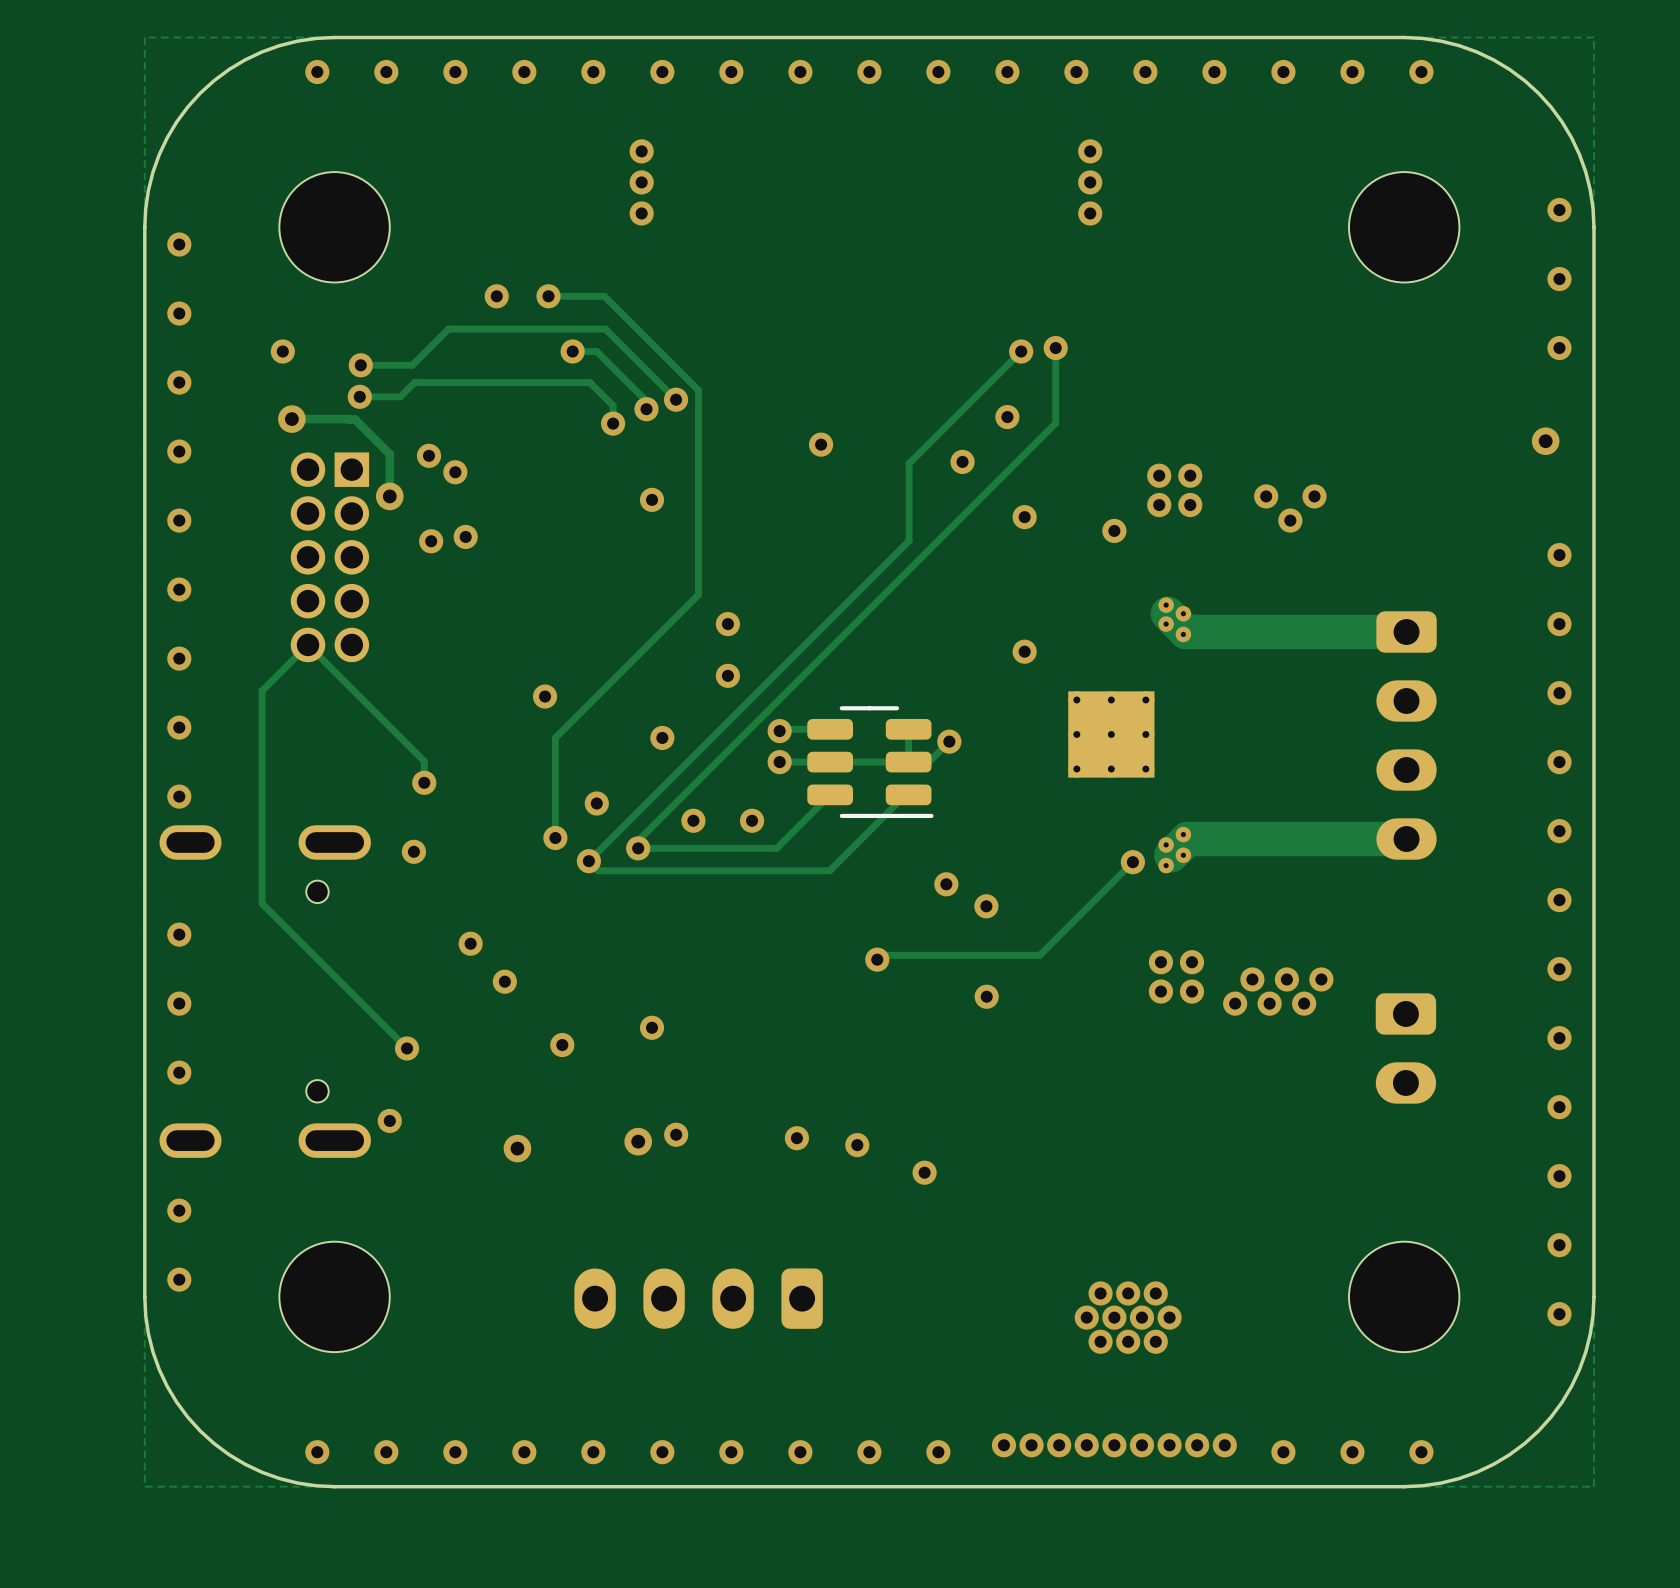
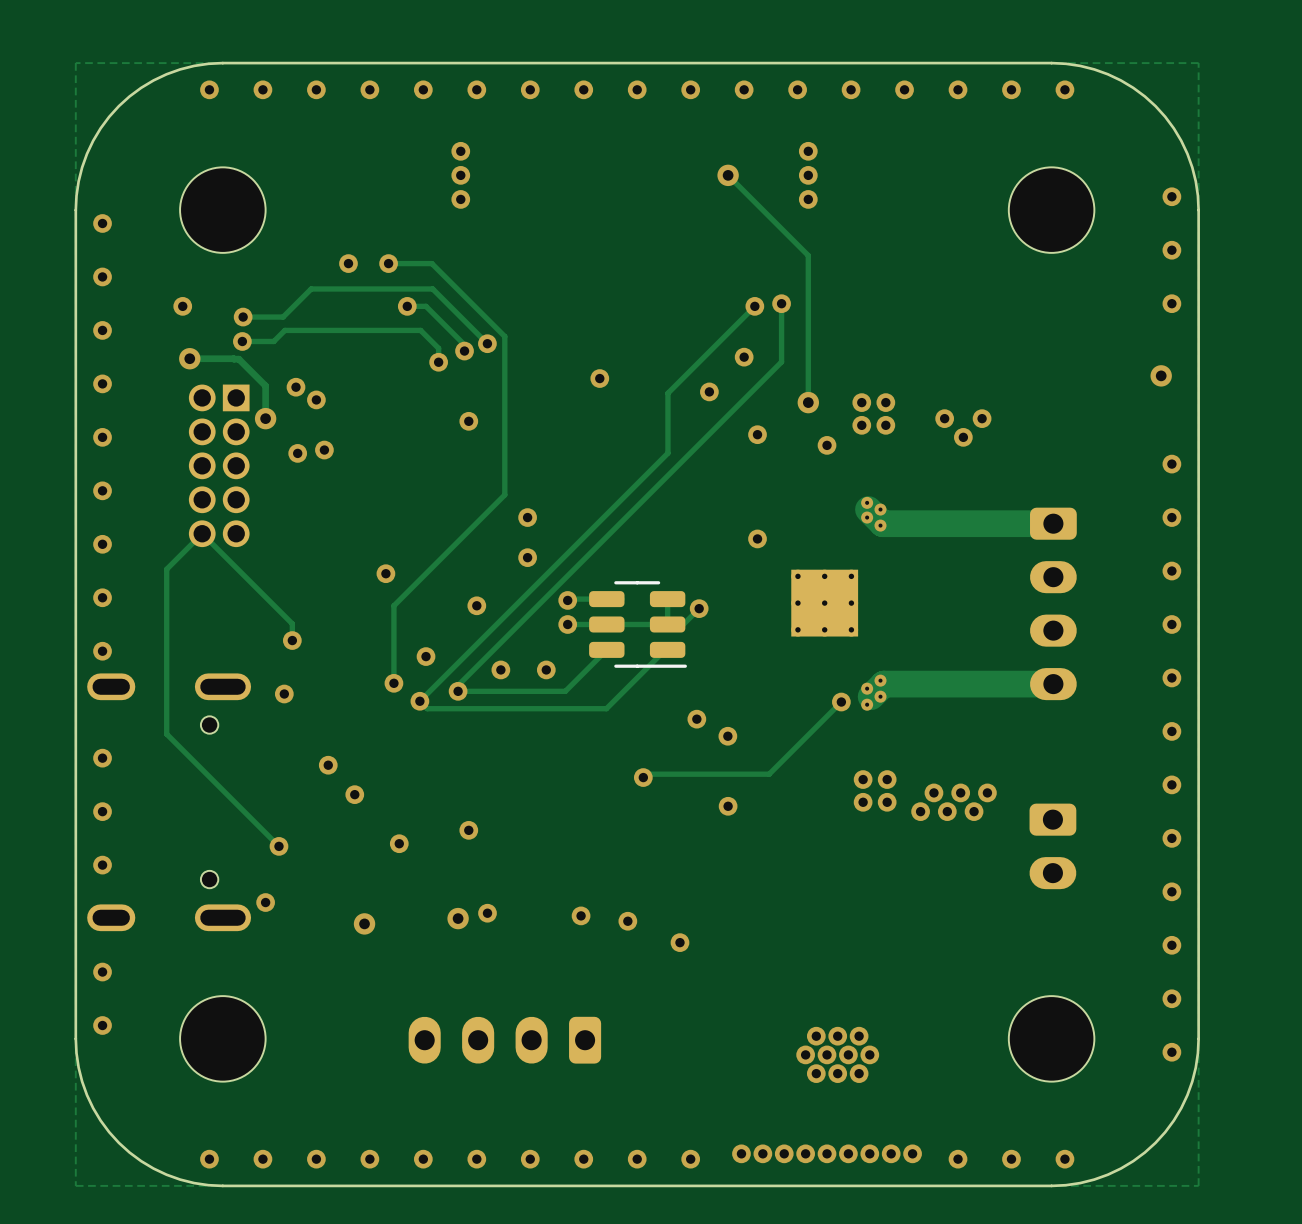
track: none -> (728, 175) (808, 255) (808, 402)
via: none -> (728, 175)
via: none -> (808, 402)

